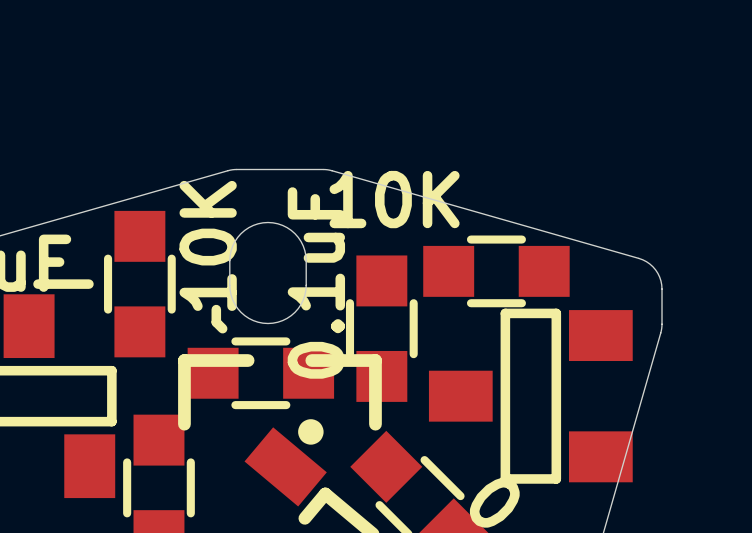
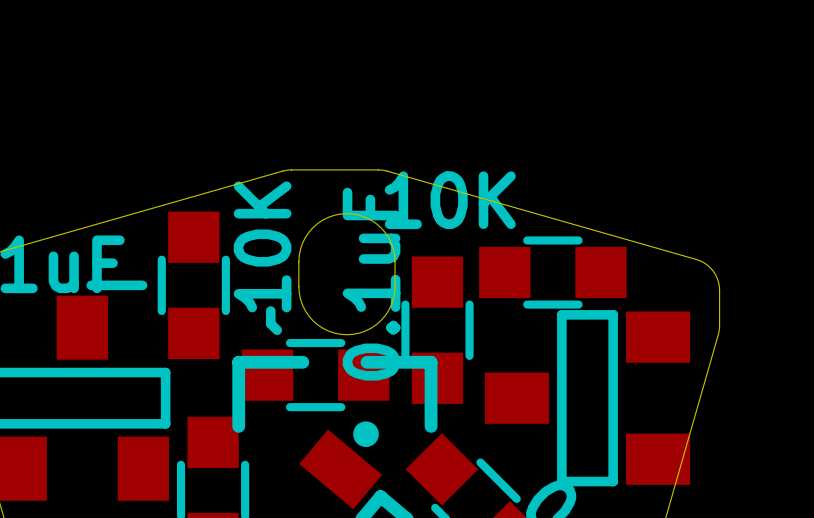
board edge: (229, 260) (231, 295) (237, 308) (248, 318) (263, 323) (277, 322) (291, 315) (301, 304) (305, 290) (305, 255) (301, 241) (287, 227) (268, 222) (248, 227) (234, 241) (229, 260) -> (298, 261) (299, 292) (302, 305) (312, 320) (322, 328) (340, 334) (359, 333) (376, 324) (388, 310) (394, 292) (394, 255) (391, 243) (385, 232) (370, 220) (359, 215) (346, 213) (334, 215) (322, 220) (312, 227) (305, 237) (300, 249) (298, 261)

